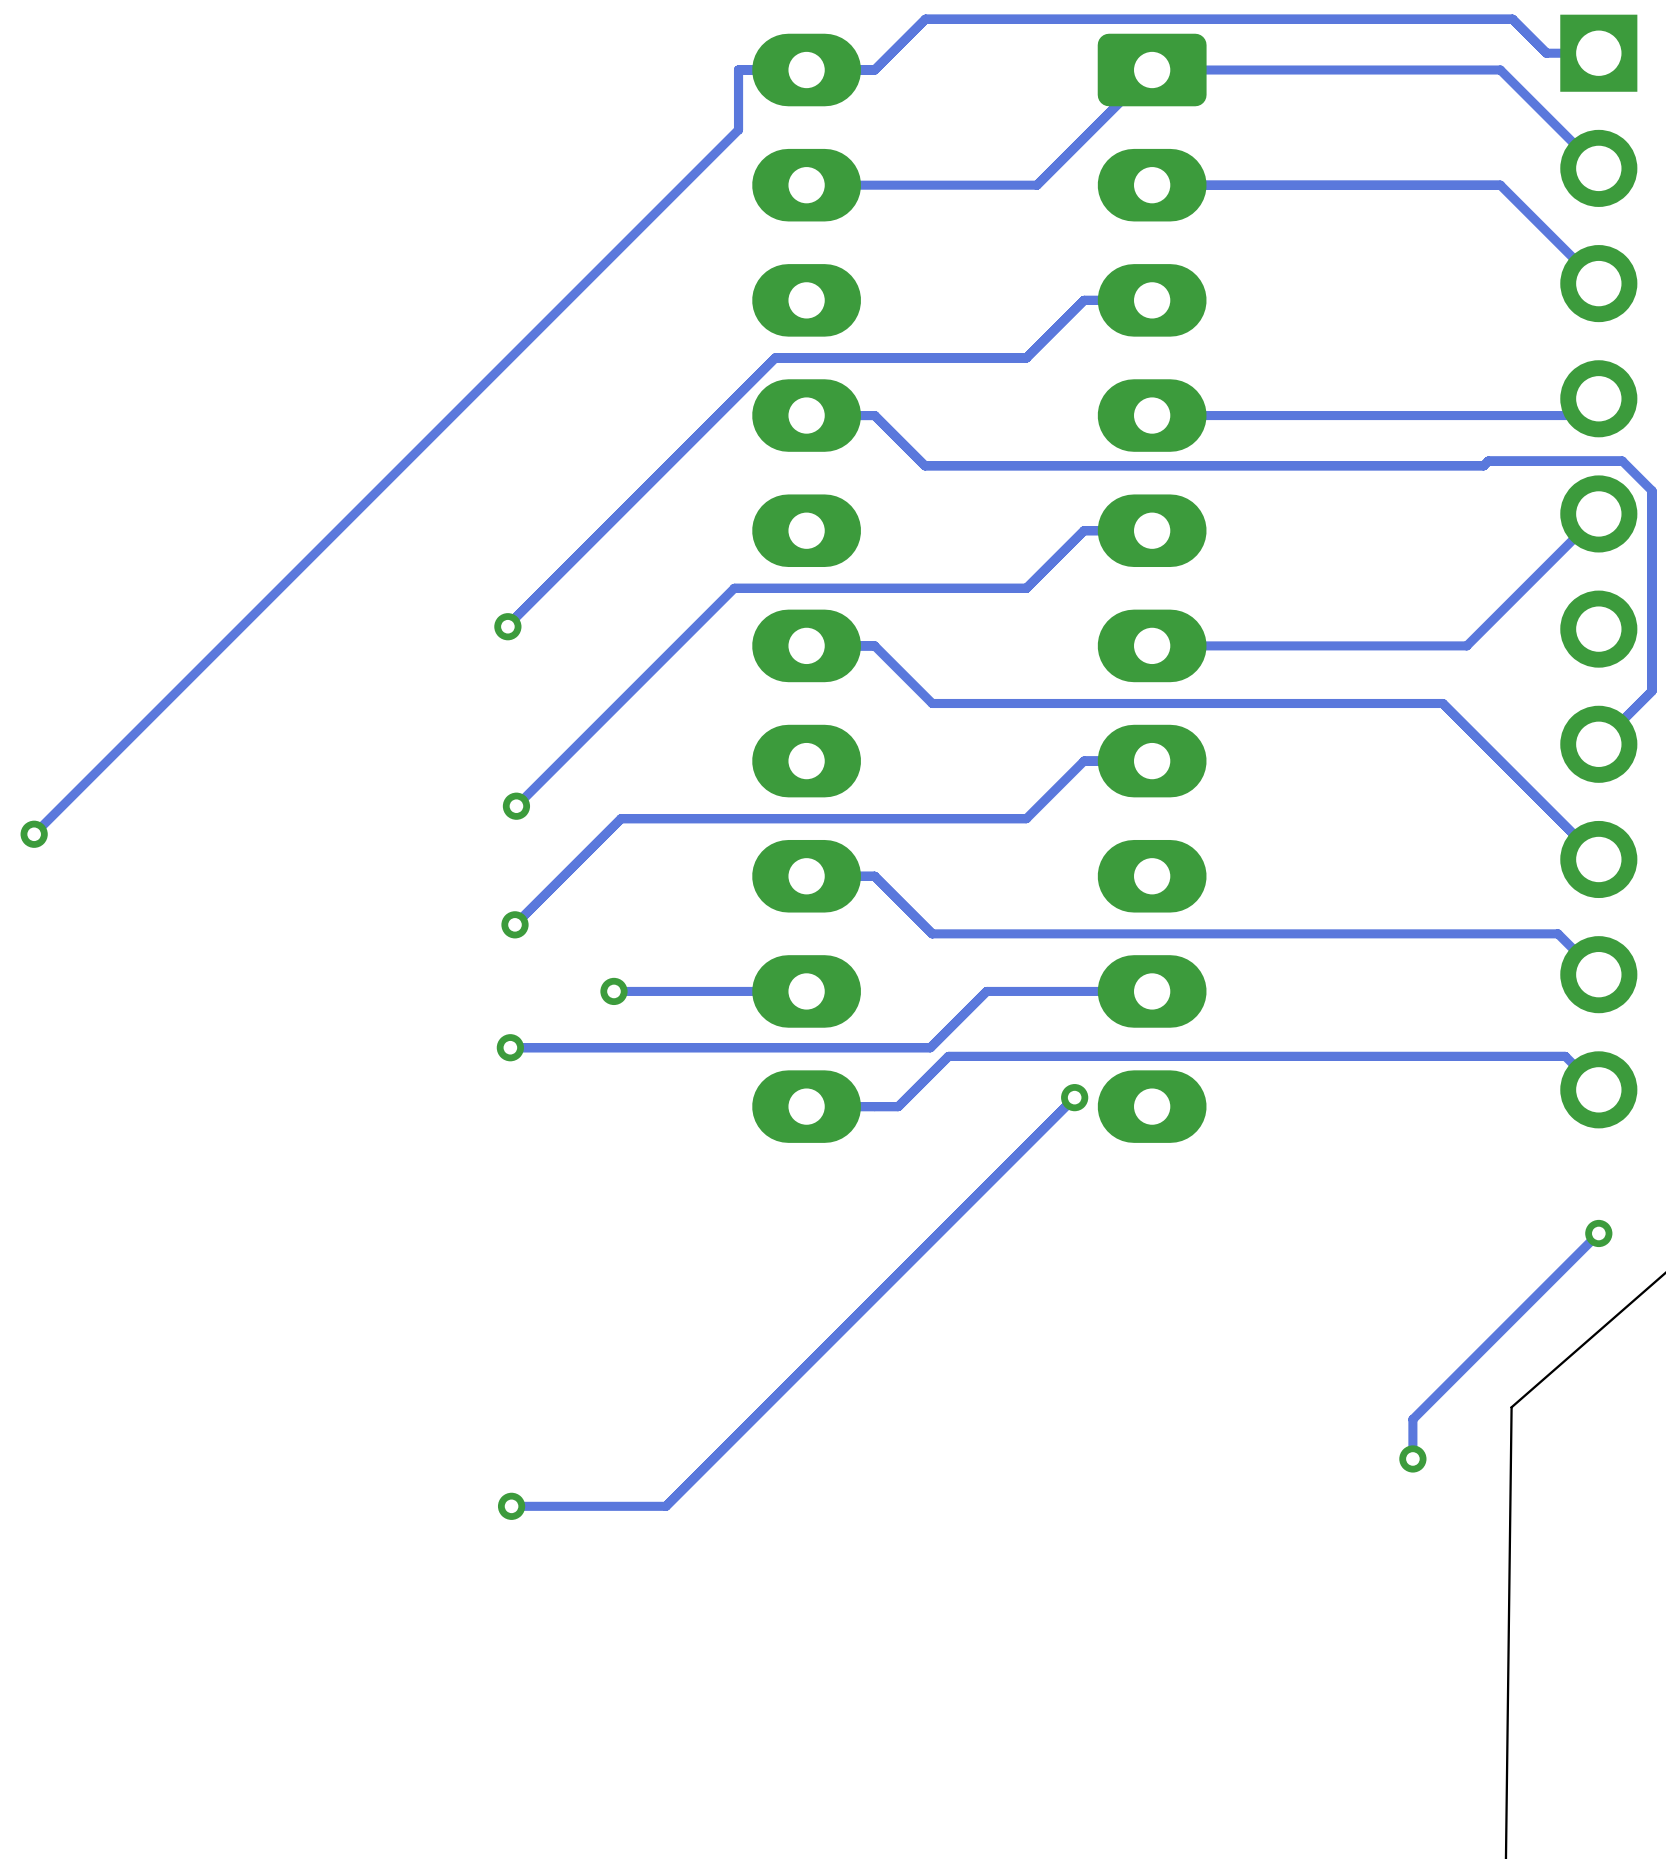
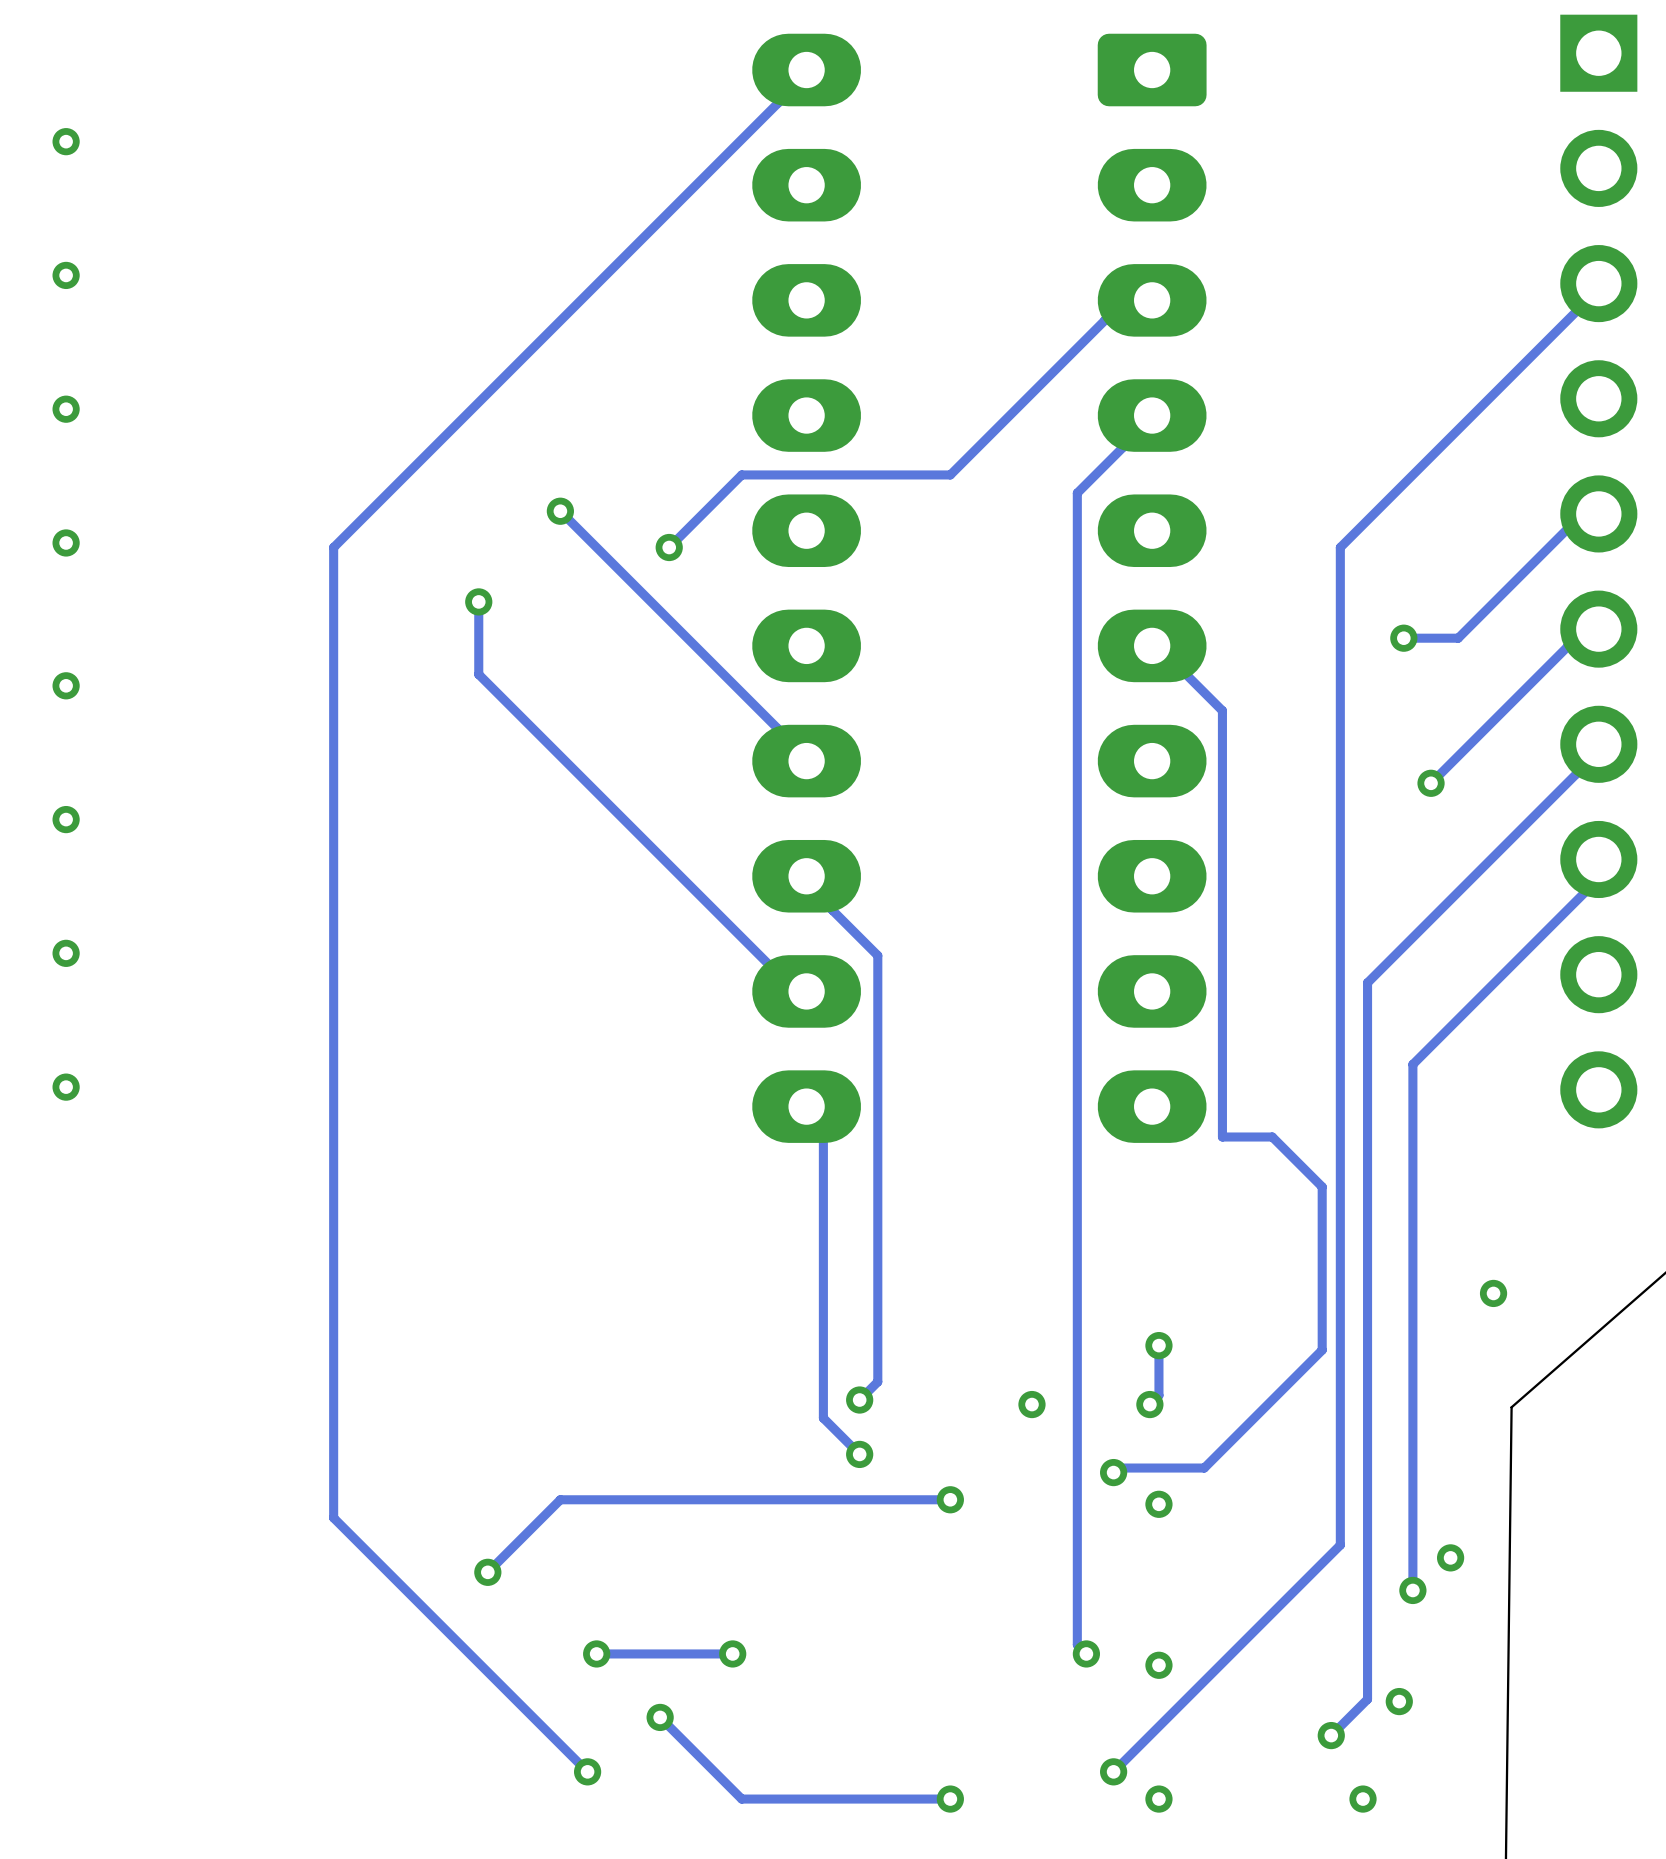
track: (1598, 53) (1546, 53) (1512, 19) (925, 19) (874, 70) (738, 70) (738, 129) (34, 834) -> none
track: none -> (806, 70) (778, 103) (333, 547) (333, 1517) (587, 1771)
via: none -> (66, 141)
track: (1598, 168) (1500, 70) (1152, 70) (1036, 185) (806, 185) -> none
track: (1152, 185) (1500, 185) (1598, 283) -> (1113, 1771) (1340, 1545) (1340, 547) (1576, 311) (1598, 283)
via: none -> (66, 275)
track: (1152, 300) (1084, 300) (1026, 357) (775, 357) (507, 626) -> (1152, 300) (1104, 320) (950, 474) (741, 474) (669, 547)
track: (1598, 398) (1582, 415) (1152, 415) -> (1086, 1653) (1077, 1644) (1077, 493) (1152, 415)
via: none -> (66, 409)
track: (806, 415) (874, 415) (924, 465) (1483, 465) (1488, 461) (1622, 461) (1651, 490) (1651, 691) (1598, 744) -> (1331, 1735) (1367, 1699) (1367, 982) (1576, 774) (1598, 744)
track: none -> (560, 511) (778, 728) (806, 761)
via: none -> (560, 511)
track: (1598, 513) (1466, 645) (1152, 645) -> (1598, 513) (1567, 529) (1458, 638) (1403, 638)
track: (1152, 530) (1084, 530) (1026, 588) (734, 588) (516, 806) -> none
via: none -> (66, 542)
via: none -> (669, 547)
via position: (507, 626) -> (478, 601)
track: none -> (1598, 629) (1567, 647) (1431, 783)
via: none -> (1403, 638)
track: (806, 645) (874, 645) (932, 703) (1442, 703) (1598, 859) -> none
track: none -> (1152, 645) (1186, 674) (1222, 710) (1222, 1137) (1272, 1137) (1322, 1186) (1322, 1350) (1204, 1468) (1118, 1468) (1113, 1472)
via: none -> (66, 685)
track: (1152, 761) (1084, 761) (1026, 818) (621, 818) (515, 924) -> none
via: none -> (1431, 783)
via: (516, 806) -> none
via position: (34, 834) -> (66, 819)
track: (806, 876) (874, 876) (932, 933) (1558, 933) (1598, 974) -> (806, 876) (832, 910) (877, 955) (877, 1381) (859, 1400)
via: (515, 924) -> none
via: none -> (66, 953)
via: (613, 991) -> none
track: (806, 991) (613, 991) -> (806, 991) (768, 964) (478, 674) (478, 601)
track: (1152, 991) (986, 991) (930, 1047) (510, 1047) -> none
via: (510, 1047) -> none
via: none -> (66, 1087)
track: (1598, 1089) (1565, 1056) (948, 1056) (898, 1106) (806, 1106) -> (859, 1454) (823, 1418) (823, 1137) (806, 1106)
track: (1074, 1097) (665, 1506) (511, 1506) -> none
via: (1074, 1097) -> none
track: (1598, 1233) (1412, 1419) -> (1598, 859) (1585, 892) (1412, 1064) (1412, 1419)
via: (1598, 1233) -> none
via: none -> (1493, 1293)
track: none -> (1158, 1345) (1158, 1395) (1149, 1404)
via: none -> (1158, 1345)
via: none -> (859, 1400)
via: none -> (1031, 1404)
via: none -> (1149, 1404)
via: none -> (859, 1454)
track: none -> (1412, 1458) (1412, 1590)
via: (1412, 1458) -> none
via: none -> (1113, 1472)
track: none -> (950, 1499) (560, 1499) (487, 1572)
via: none -> (950, 1499)
via: none -> (1158, 1504)
via position: (511, 1506) -> (487, 1572)
via: none -> (1450, 1557)
via: none -> (1412, 1590)
via: none -> (596, 1653)
track: none -> (732, 1653) (596, 1653)
via: none -> (732, 1653)
via: none -> (1086, 1653)
via: none -> (1158, 1665)
via: none -> (1399, 1701)
track: none -> (660, 1717) (741, 1799) (950, 1799)
via: none -> (660, 1717)
via: none -> (1331, 1735)
via: none -> (587, 1771)
via: none -> (1113, 1771)
via: none -> (950, 1799)
via: none -> (1158, 1799)
via: none -> (1363, 1799)

